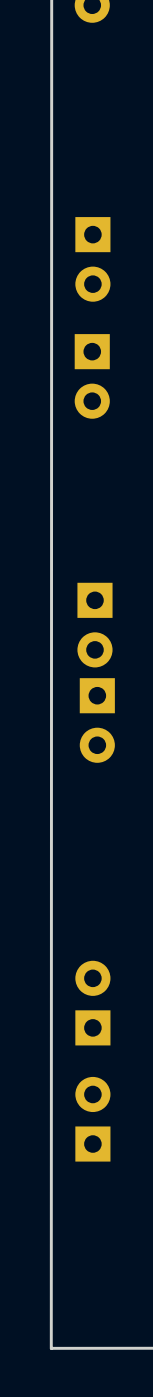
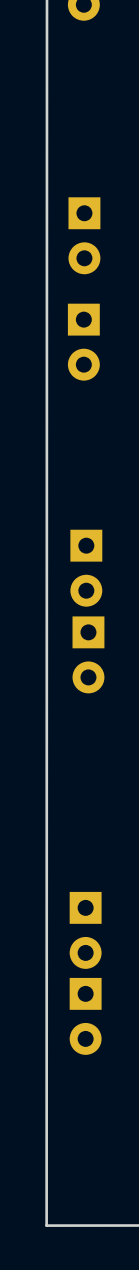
part rotation: 0° (92, 1003) -> 180° (85, 930)
part rotation: 0° (92, 1119) -> 180° (85, 1016)

